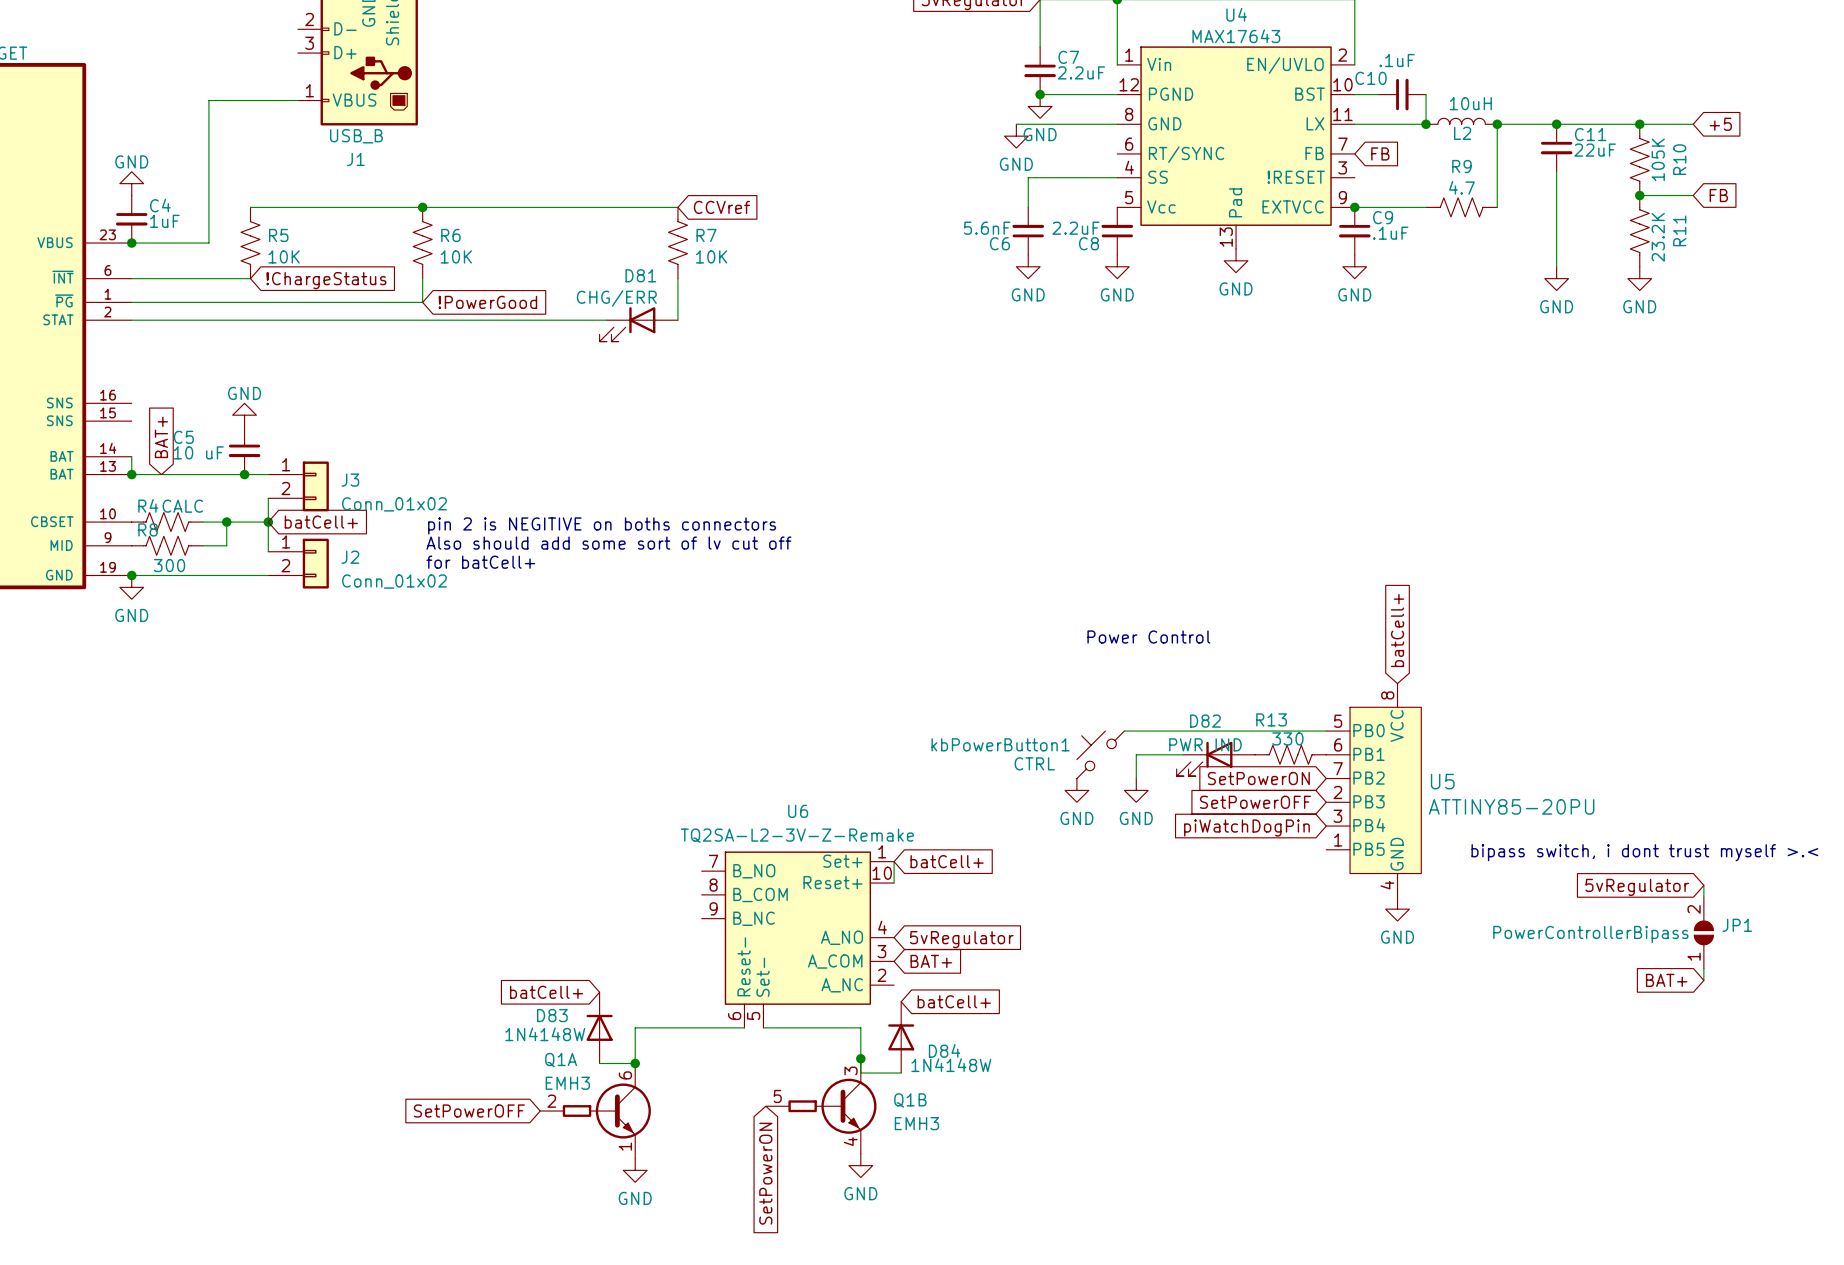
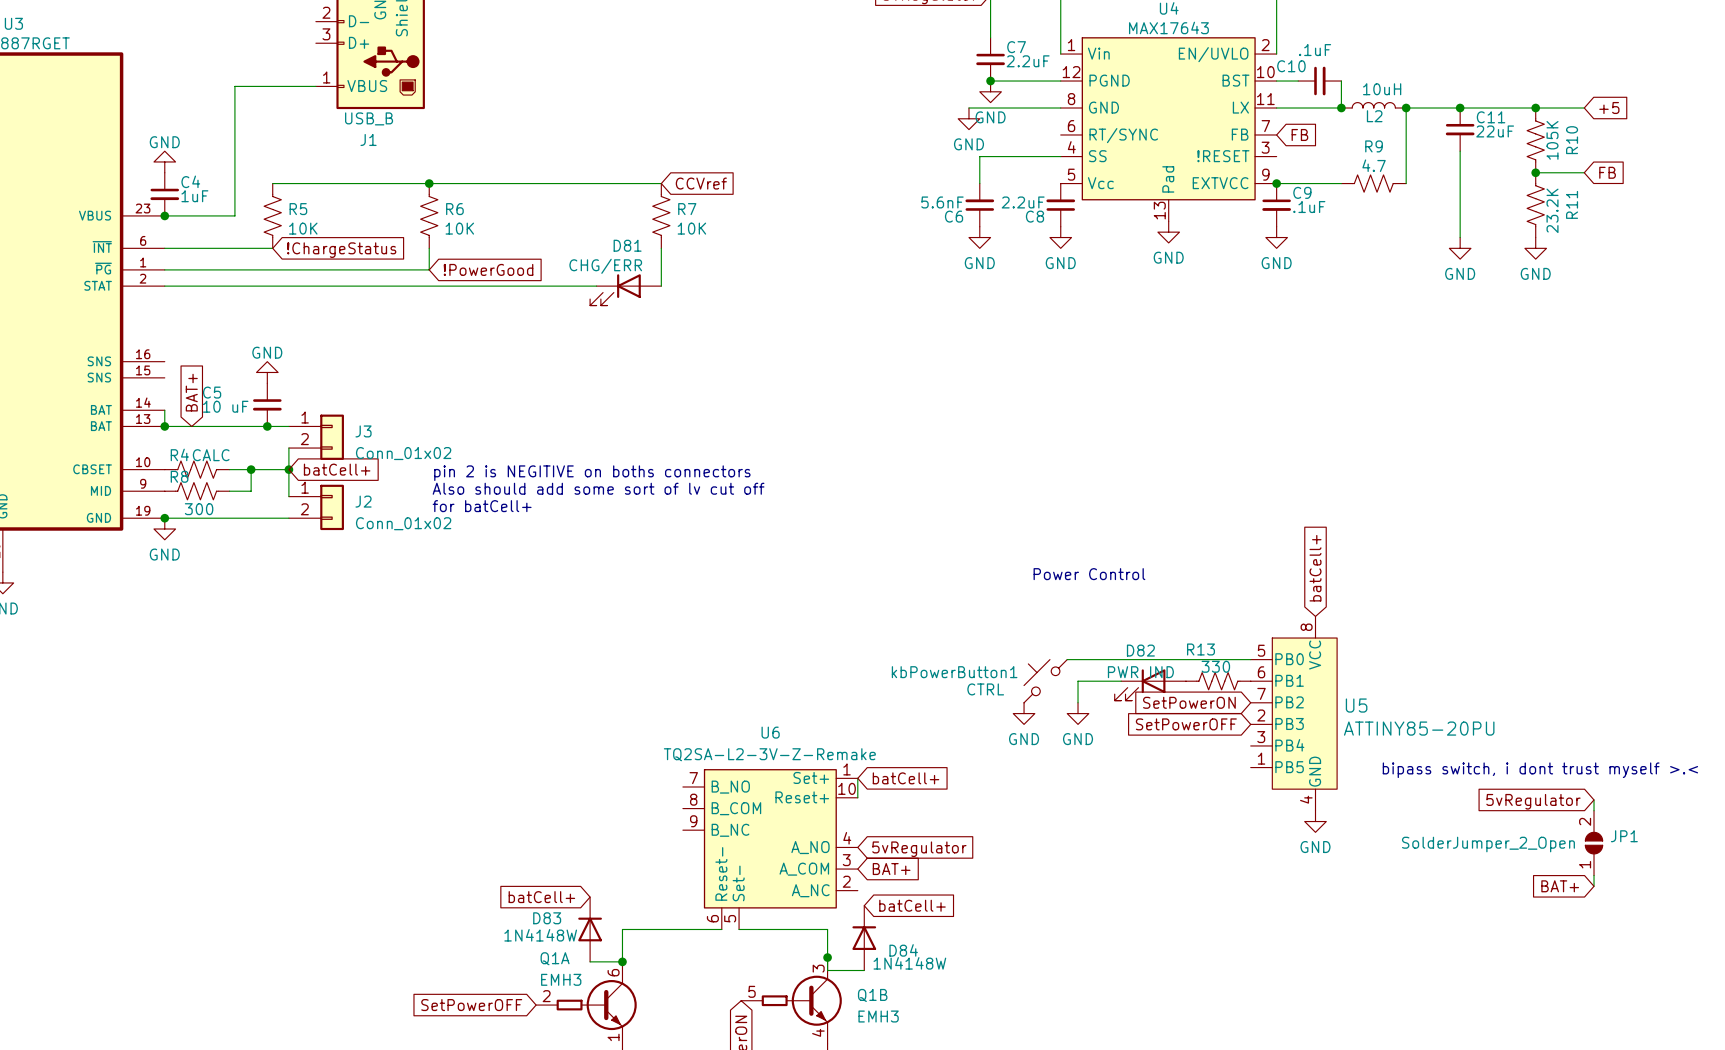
global label: piWatchDogPin (1246, 828) -> none
JP1 value: PowerControllerBipass (1590, 934) -> SolderJumper_2_Open (1488, 844)

